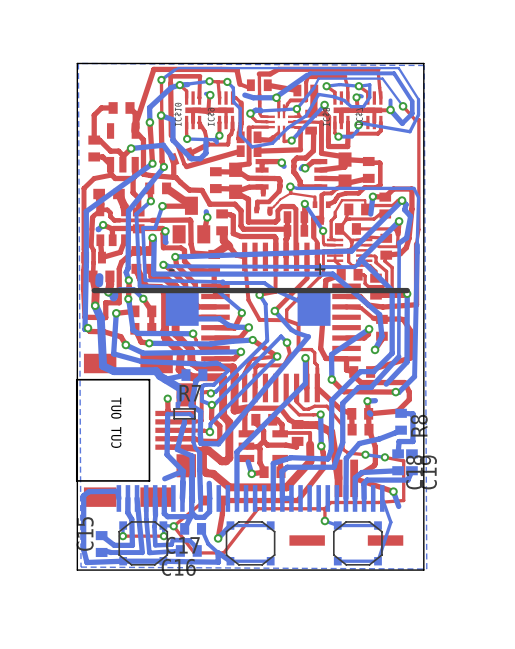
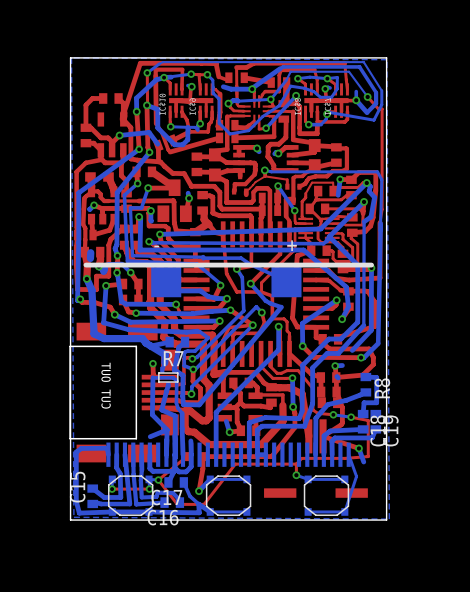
part: none -> (329, 402)

